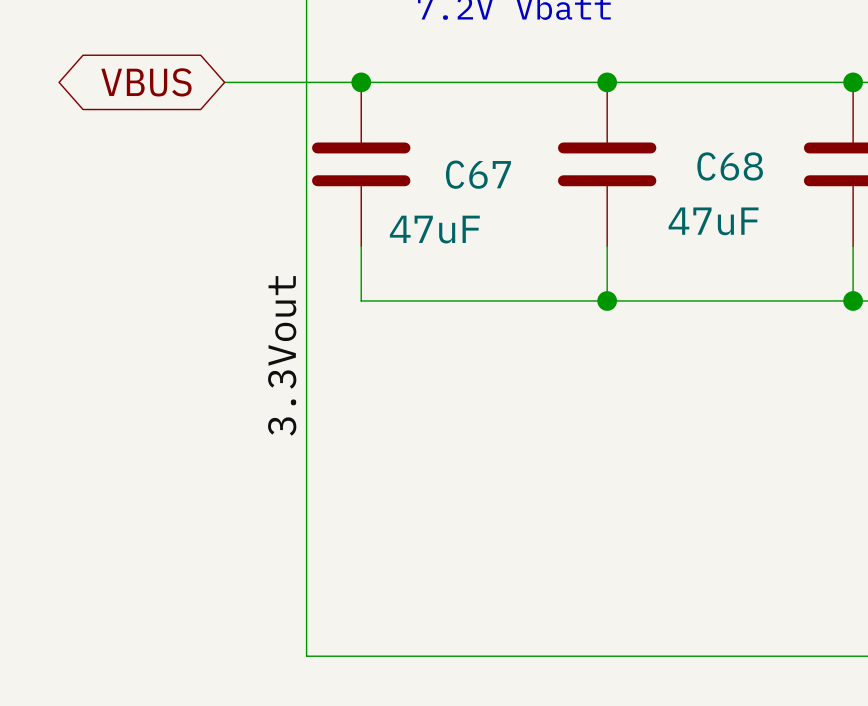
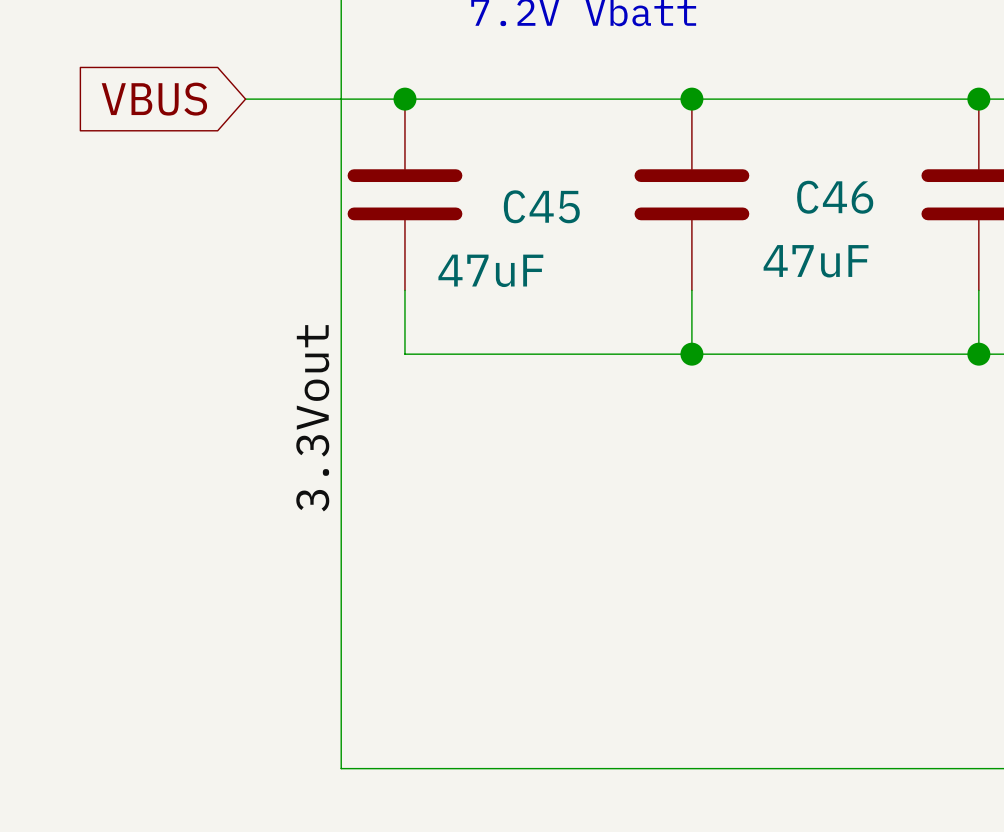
global label shape: bidirectional (146, 82) -> input (154, 99)
C68 name: C68 (730, 166) -> C46 (835, 197)
C67 name: C67 (478, 174) -> C45 (541, 206)

